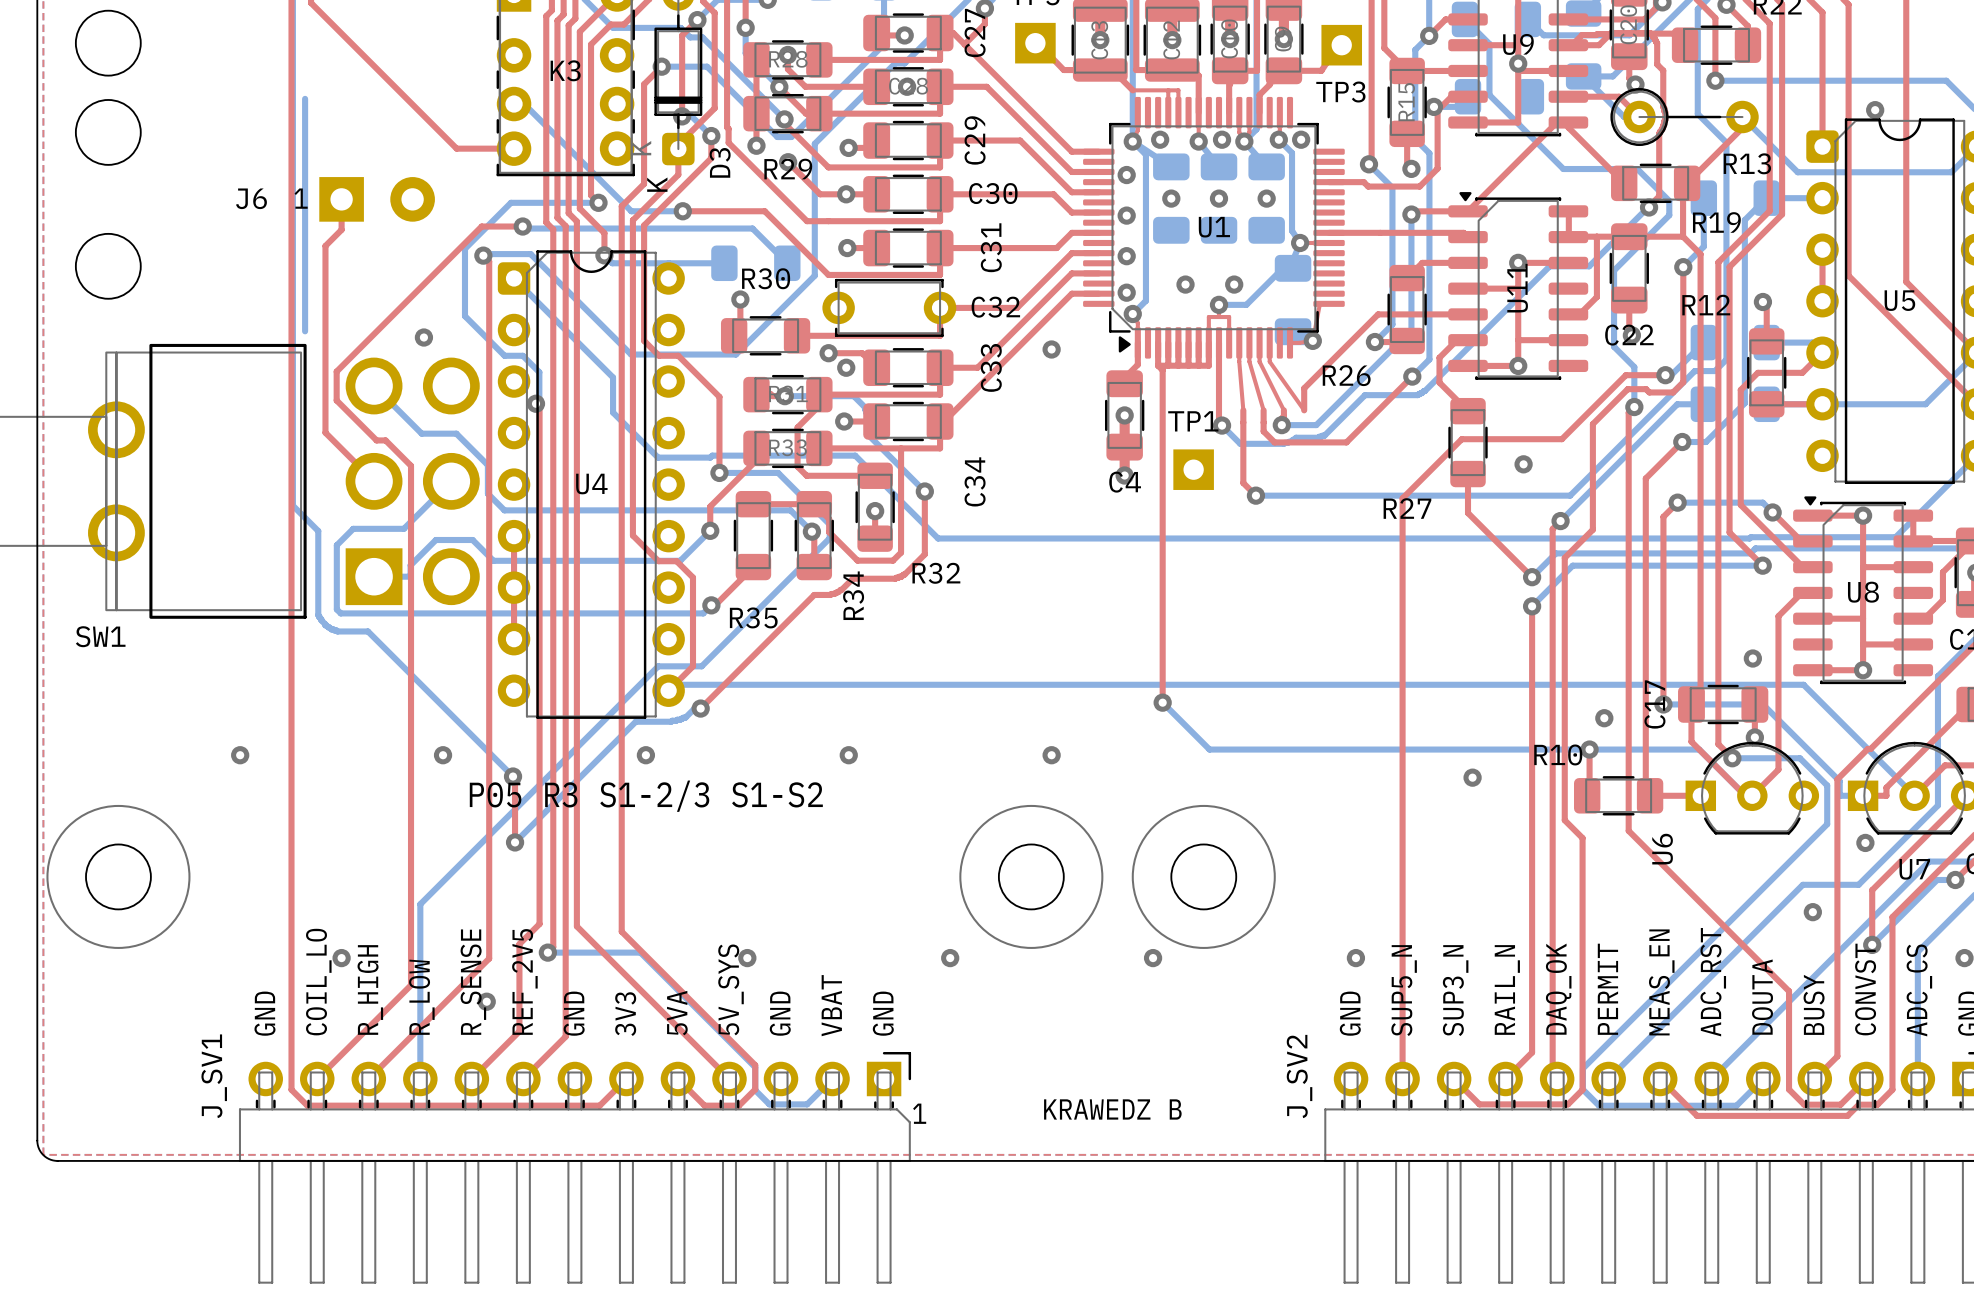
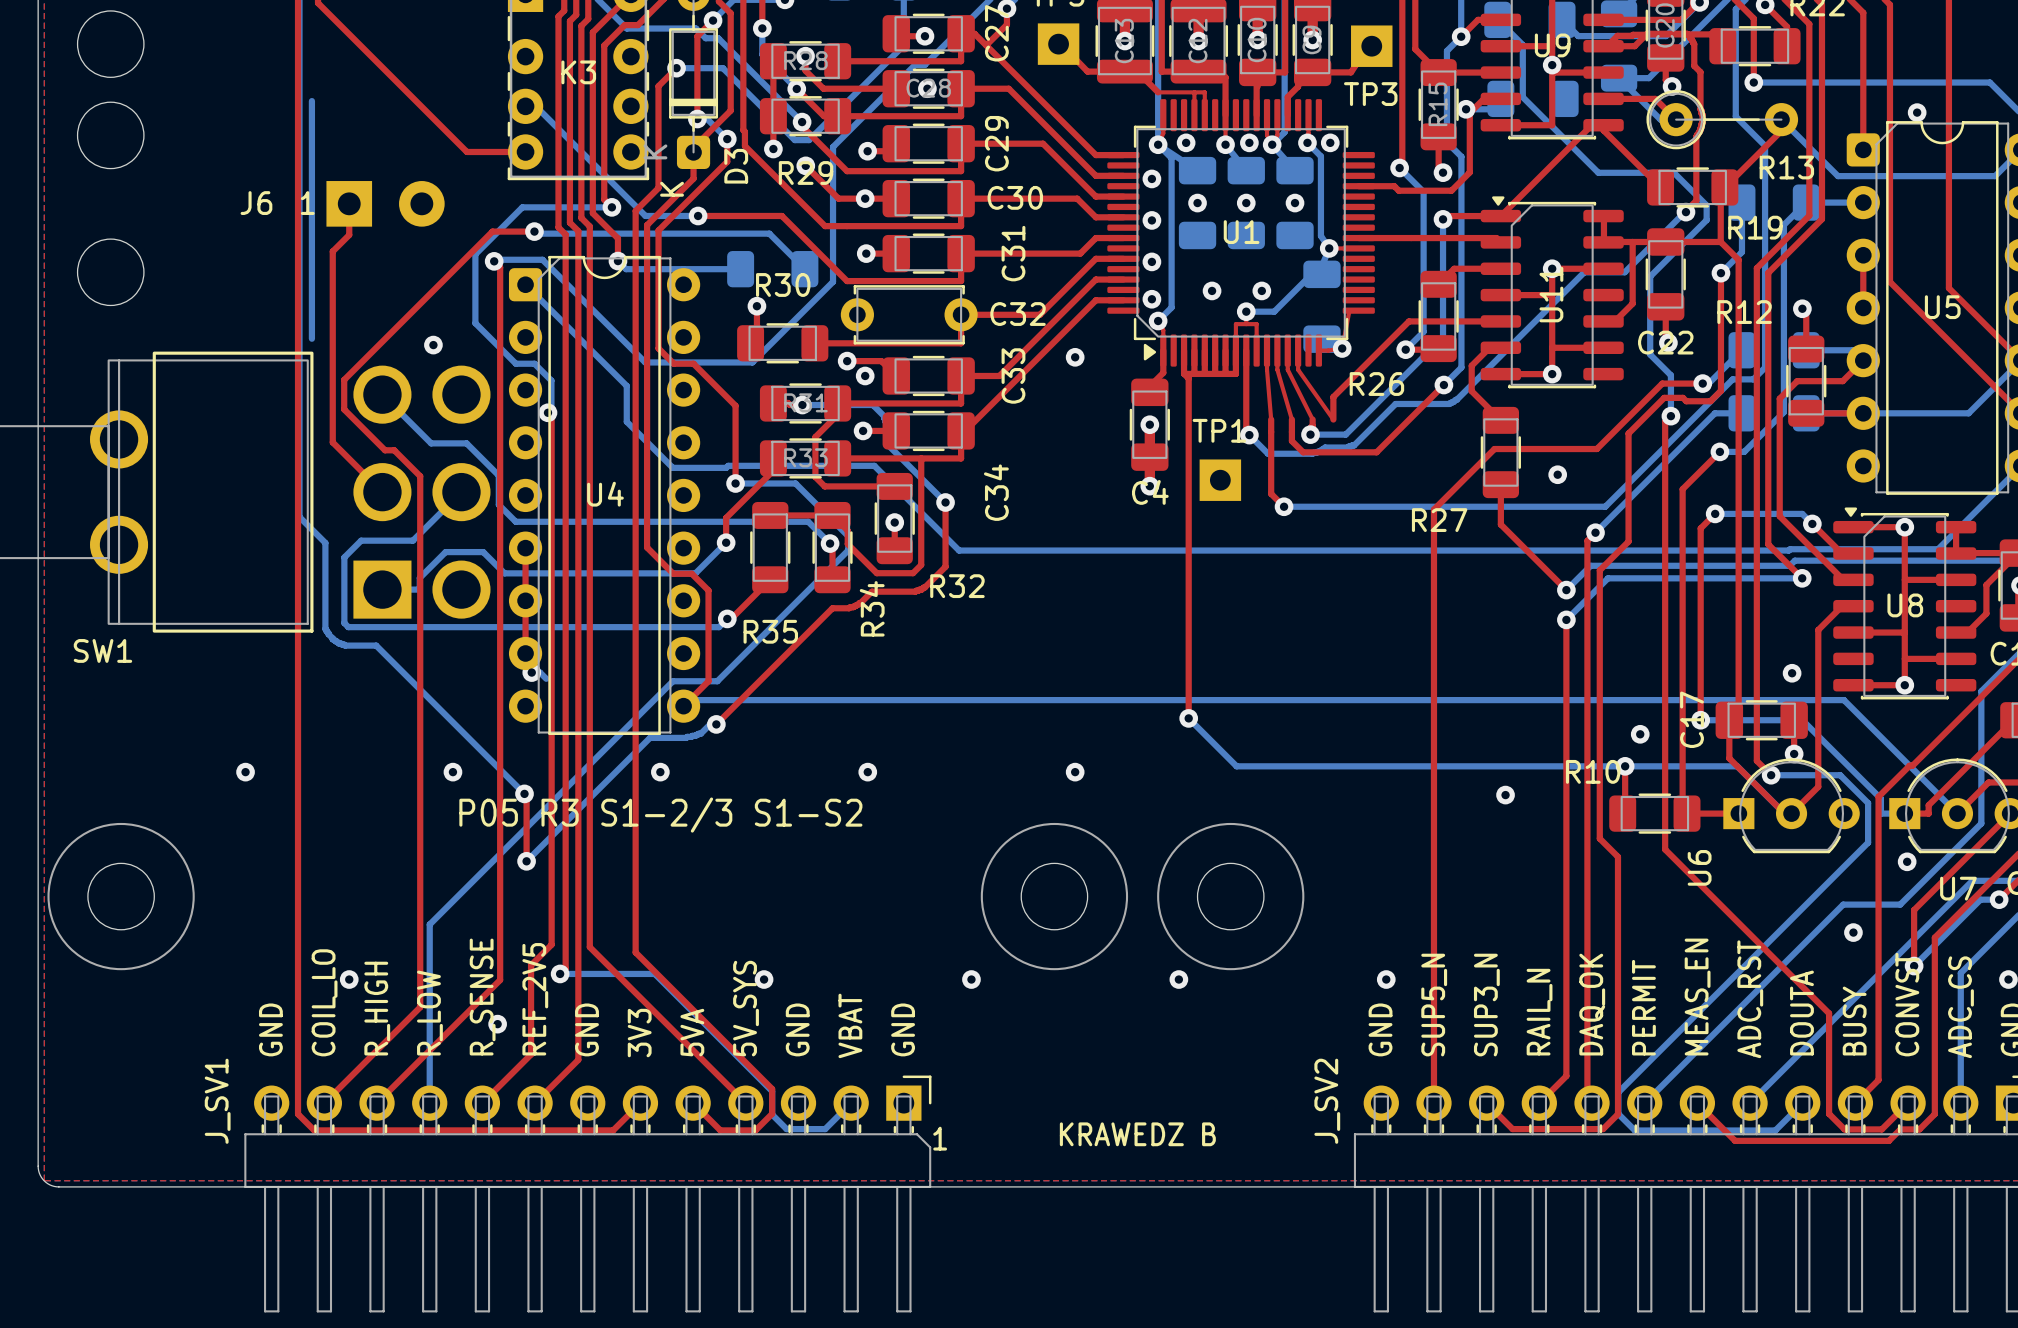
bottom track: none -> (531, 672) (540, 672) (546, 678)
via: none -> (531, 672)

